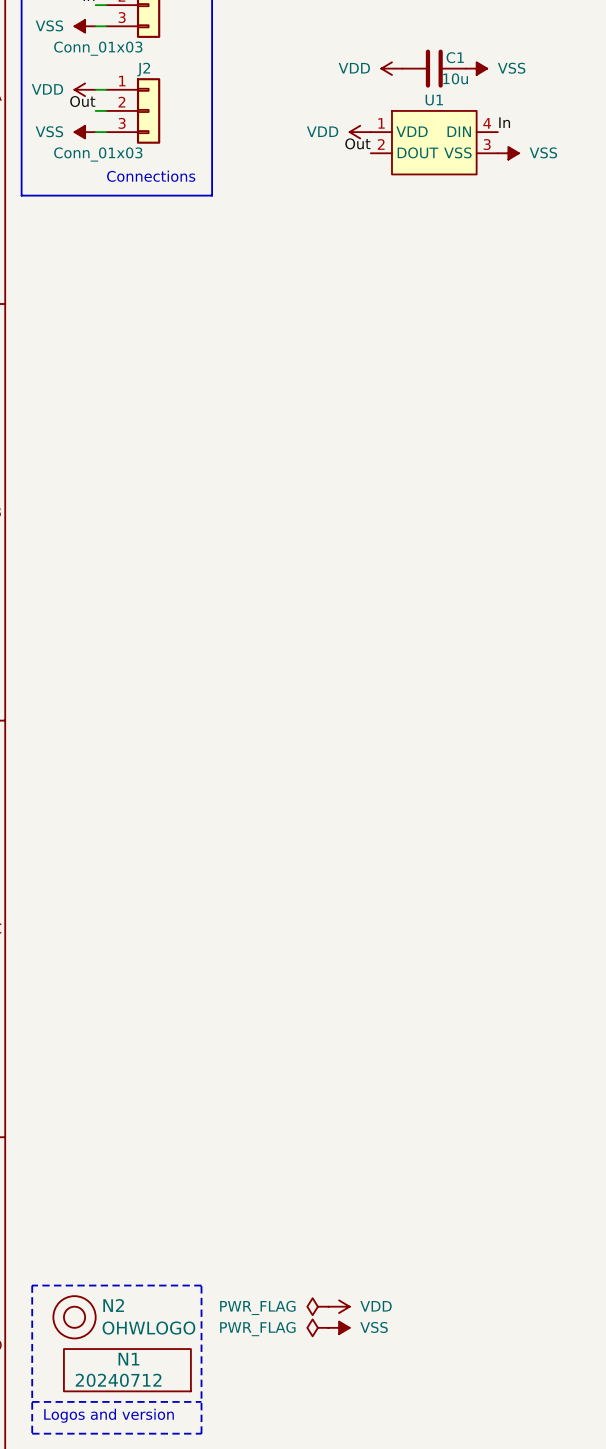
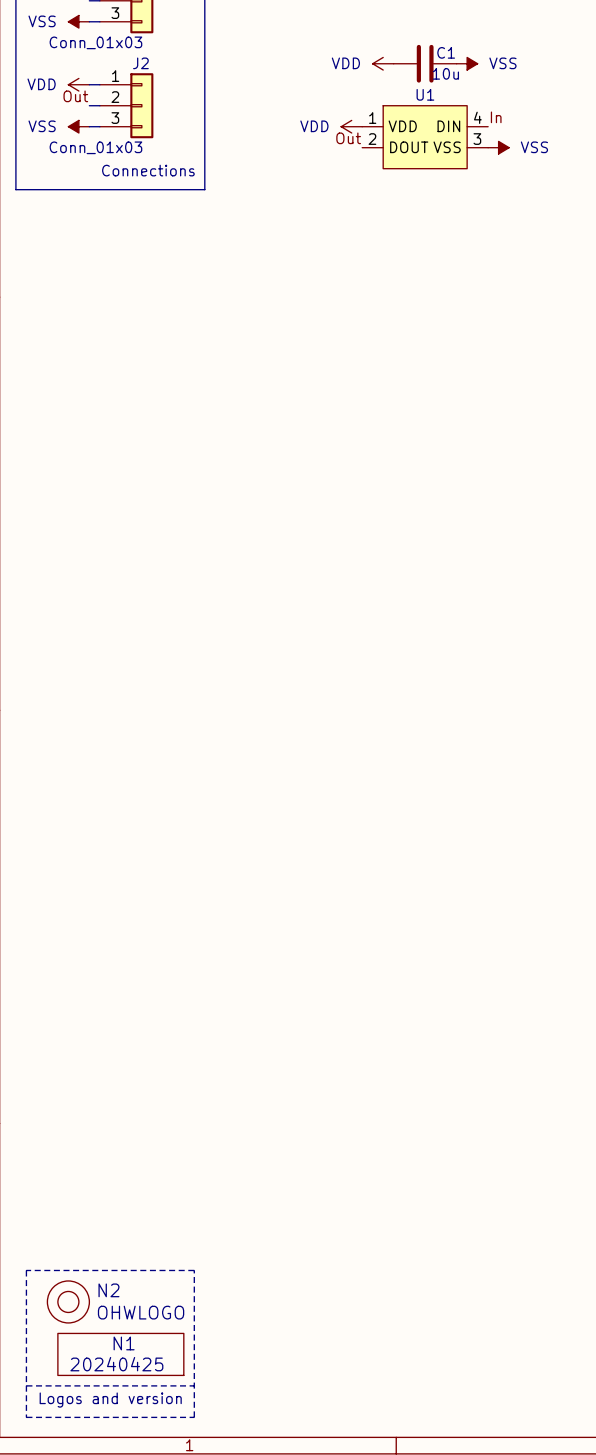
power symbol: PWR_FLAG (317, 1306) -> none
power symbol: VDD (339, 1306) -> none
power symbol: PWR_FLAG (317, 1327) -> none
power symbol: VSS (339, 1327) -> none
N1 value: 20240712 (118, 1380) -> 20240425 (116, 1364)

